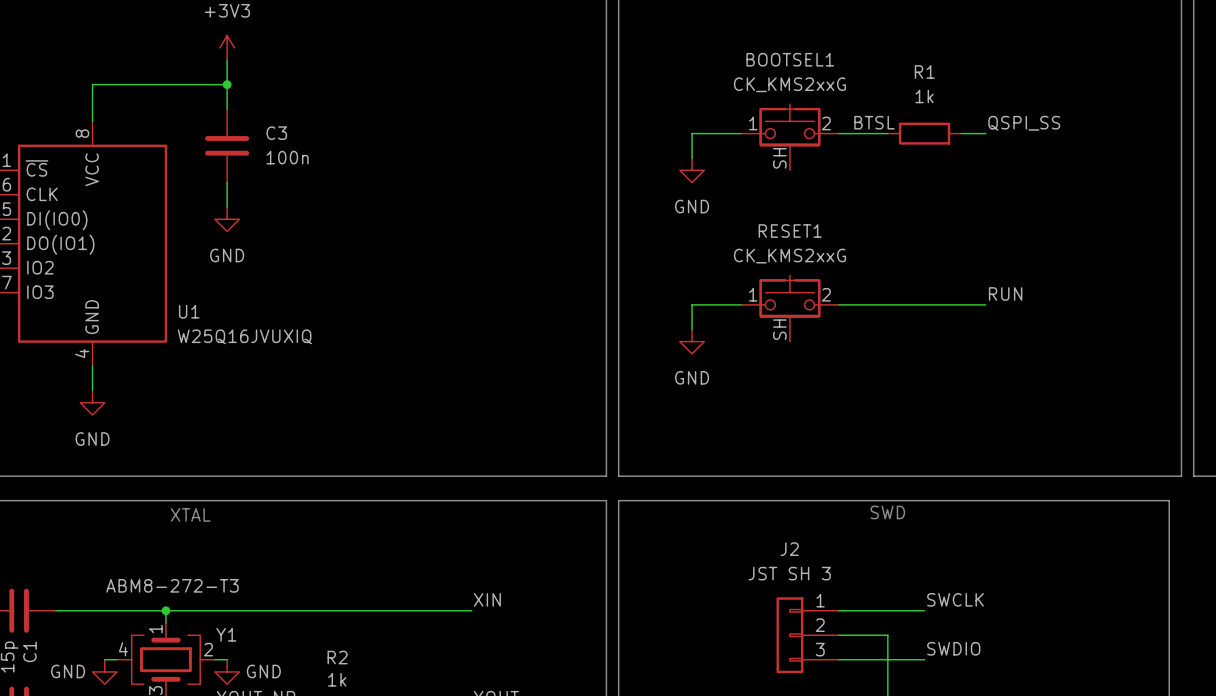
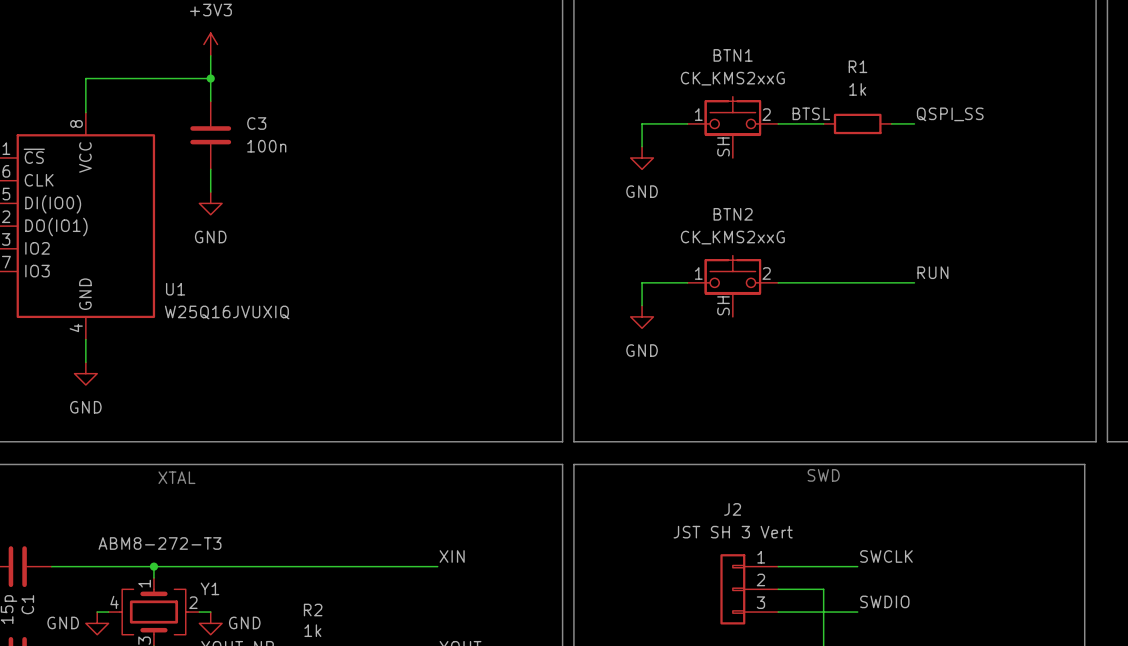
BOOTSEL1 name: BOOTSEL1 (790, 59) -> BTN1 (733, 55)
RESET1 name: RESET1 (790, 231) -> BTN2 (733, 214)
J2 value: JST SH 3 (789, 573) -> JST SH 3 Vert (733, 532)

